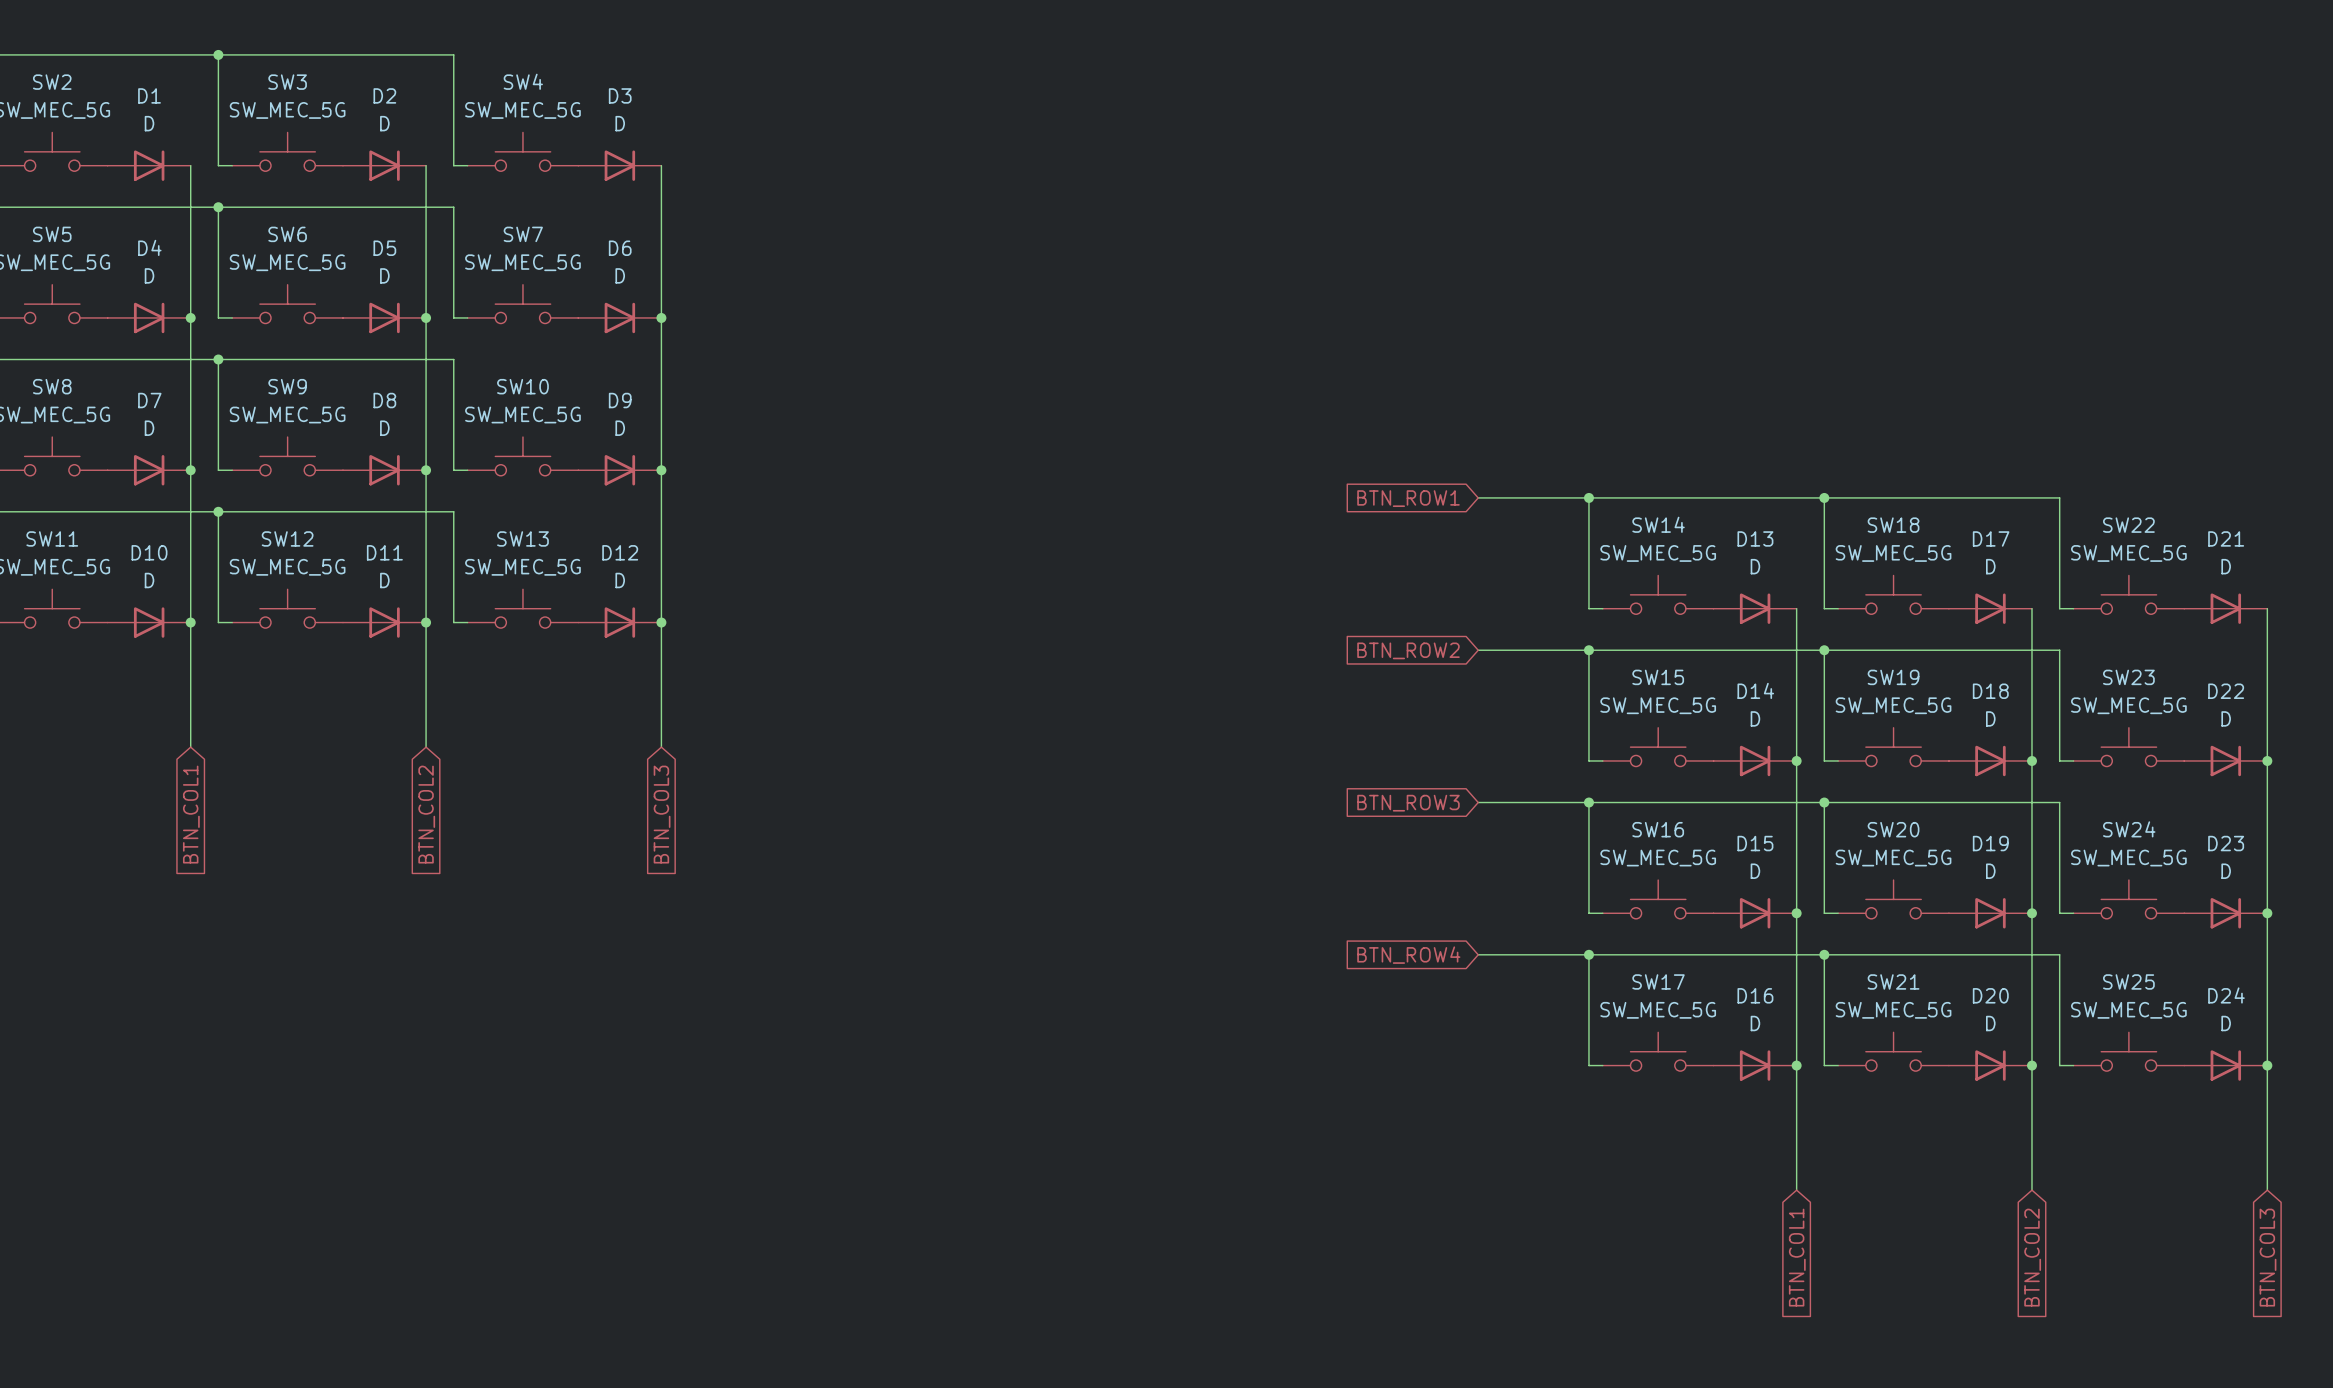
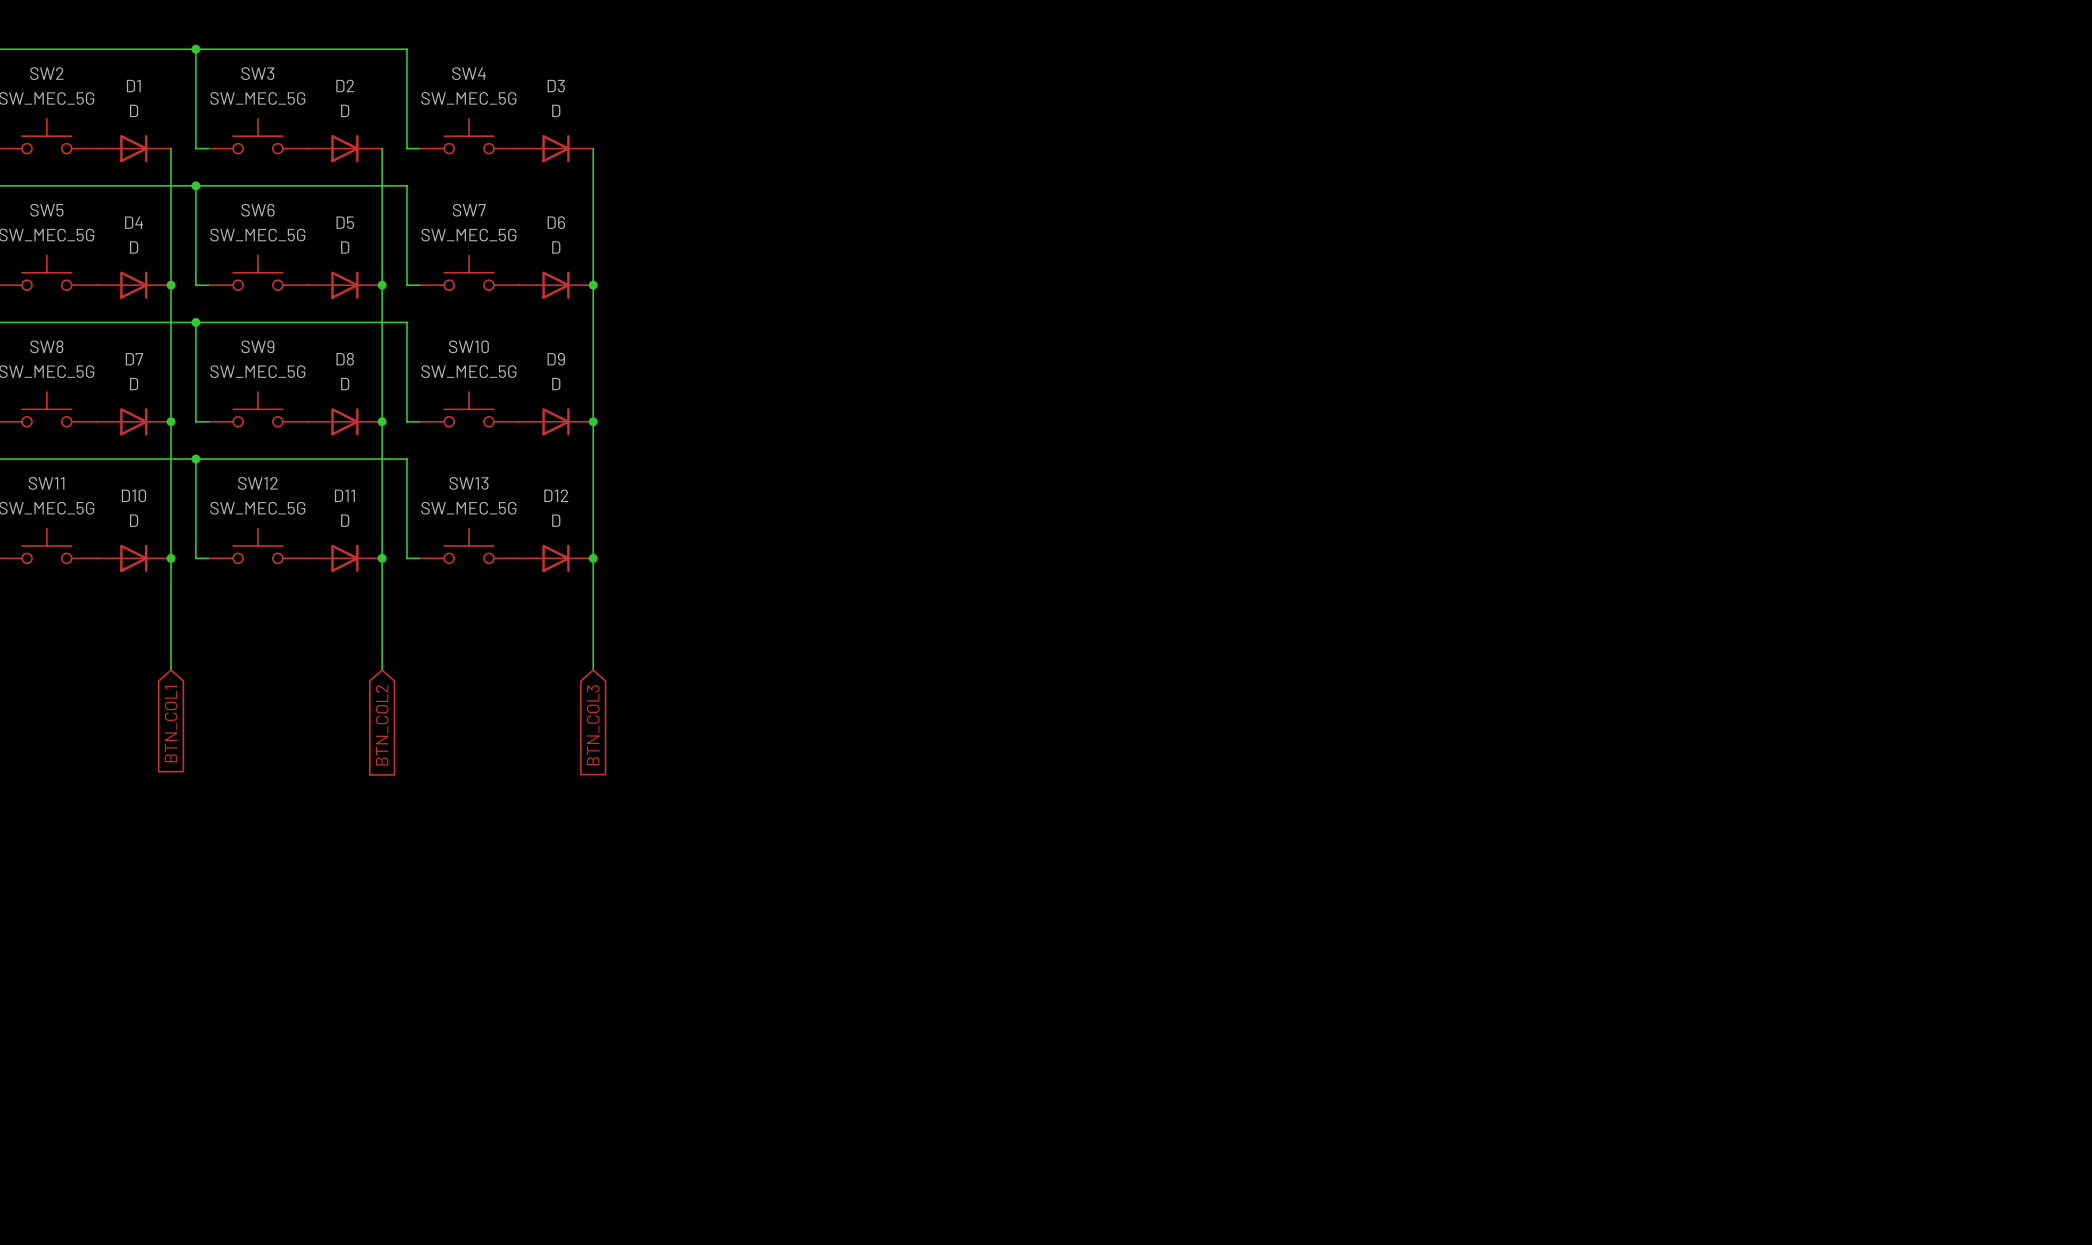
wire: (1478, 497) (2059, 497) (2059, 608) (2073, 608) -> none
wire: (1588, 497) (1588, 608) (1602, 608) -> none
junction: (1588, 497) -> none
wire: (1824, 497) (1824, 608) (1838, 608) -> none
junction: (1824, 497) -> none
global label: BTN_ROW1 (1408, 498) -> none
SW14: SW_MEC_5G (1658, 594) -> none
SW18: SW_MEC_5G (1893, 594) -> none
SW22: SW_MEC_5G (2128, 594) -> none
D13: D (1755, 608) -> none
wire: (1796, 608) (1796, 1190) -> none
D17: D (1990, 608) -> none
wire: (2031, 608) (2031, 1190) -> none
D21: D (2225, 608) -> none
wire: (2267, 608) (2267, 1190) -> none
global label: BTN_ROW2 (1408, 650) -> none
wire: (1478, 650) (2059, 650) (2059, 760) (2073, 760) -> none
wire: (1588, 650) (1588, 760) (1602, 760) -> none
junction: (1588, 650) -> none
wire: (1824, 650) (1824, 760) (1838, 760) -> none
junction: (1824, 650) -> none
SW15: SW_MEC_5G (1658, 747) -> none
SW19: SW_MEC_5G (1893, 747) -> none
SW23: SW_MEC_5G (2128, 747) -> none
D14: D (1755, 760) -> none
junction: (1796, 760) -> none
D18: D (1990, 760) -> none
junction: (2031, 760) -> none
D22: D (2225, 760) -> none
junction: (2267, 760) -> none
wire: (1478, 802) (2059, 802) (2059, 913) (2073, 913) -> none
wire: (1588, 802) (1588, 913) (1602, 913) -> none
junction: (1588, 802) -> none
wire: (1824, 802) (1824, 913) (1838, 913) -> none
junction: (1824, 802) -> none
global label: BTN_ROW3 (1408, 803) -> none
SW16: SW_MEC_5G (1658, 899) -> none
SW20: SW_MEC_5G (1893, 899) -> none
SW24: SW_MEC_5G (2128, 899) -> none
D15: D (1755, 913) -> none
junction: (1796, 913) -> none
D19: D (1990, 913) -> none
junction: (2031, 913) -> none
D23: D (2225, 913) -> none
junction: (2267, 913) -> none
wire: (1478, 954) (2059, 954) (2059, 1065) (2073, 1065) -> none
wire: (1588, 954) (1588, 1065) (1602, 1065) -> none
junction: (1588, 954) -> none
wire: (1824, 954) (1824, 1065) (1838, 1065) -> none
junction: (1824, 954) -> none
global label: BTN_ROW4 (1408, 955) -> none
SW17: SW_MEC_5G (1658, 1051) -> none
SW21: SW_MEC_5G (1893, 1051) -> none
SW25: SW_MEC_5G (2128, 1051) -> none
D16: D (1755, 1065) -> none
junction: (1796, 1065) -> none
D20: D (1990, 1065) -> none
junction: (2031, 1065) -> none
D24: D (2225, 1065) -> none
junction: (2267, 1065) -> none
global label: BTN_COL1 (1797, 1257) -> none
global label: BTN_COL2 (2032, 1257) -> none
global label: BTN_COL3 (2268, 1257) -> none

